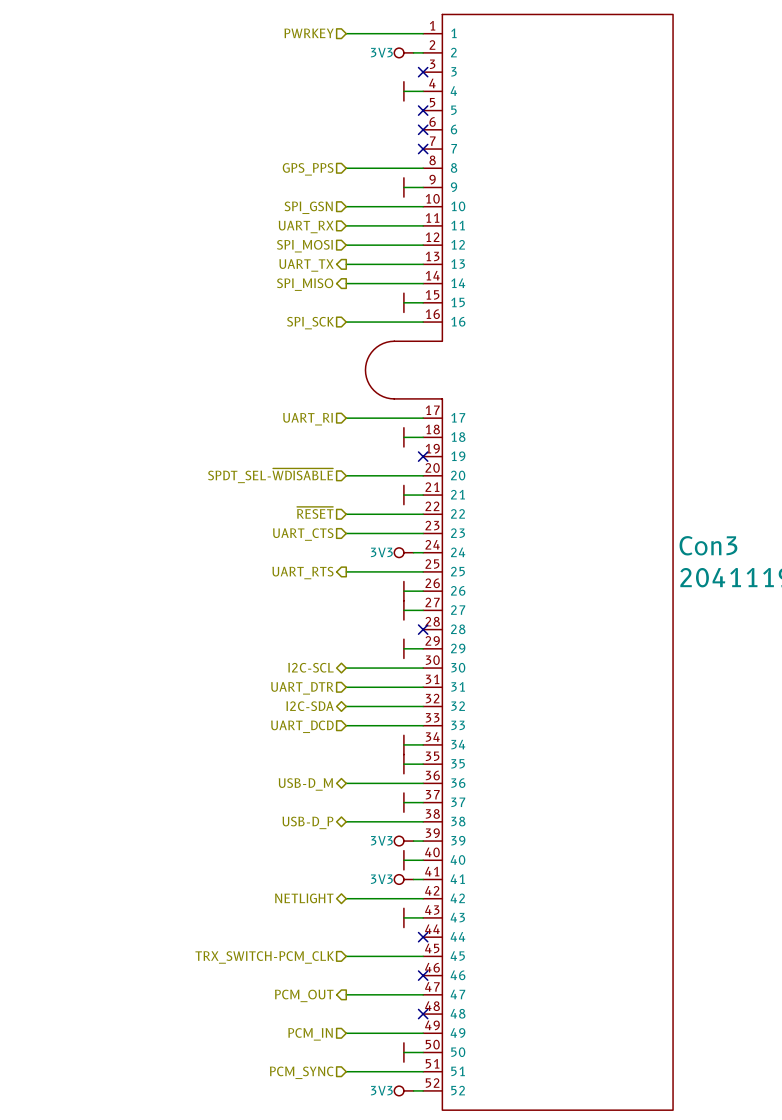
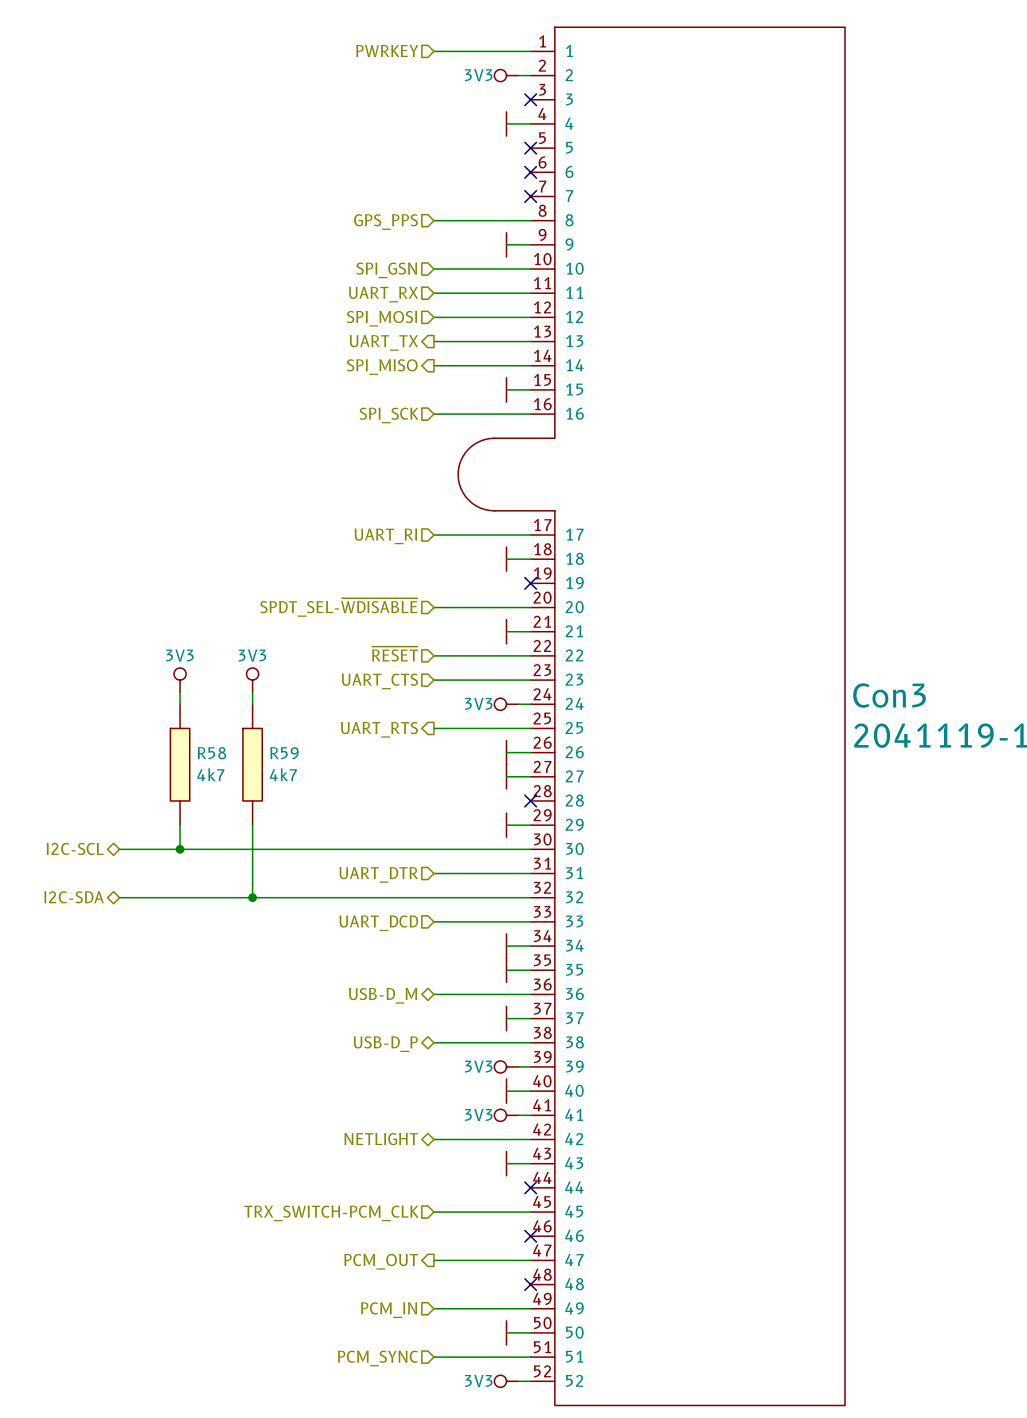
power symbol: none -> 3V3 (180, 680)
power symbol: none -> 3V3 (252, 680)
wire: none -> (180, 692) (180, 704)
wire: none -> (252, 692) (252, 704)
R58: none -> 4k7 (180, 764)
R59: none -> 4k7 (252, 764)
wire: none -> (180, 825) (180, 849)
wire: none -> (252, 825) (252, 897)
hierarchical label: none -> I2C-SCL (75, 848)
hierarchical label: I2C-SCL (310, 667) -> none
wire: none -> (119, 849) (433, 849)
junction: none -> (180, 849)
hierarchical label: none -> I2C-SDA (74, 897)
wire: none -> (119, 897) (433, 897)
junction: none -> (252, 897)
hierarchical label: I2C-SDA (310, 706) -> none

